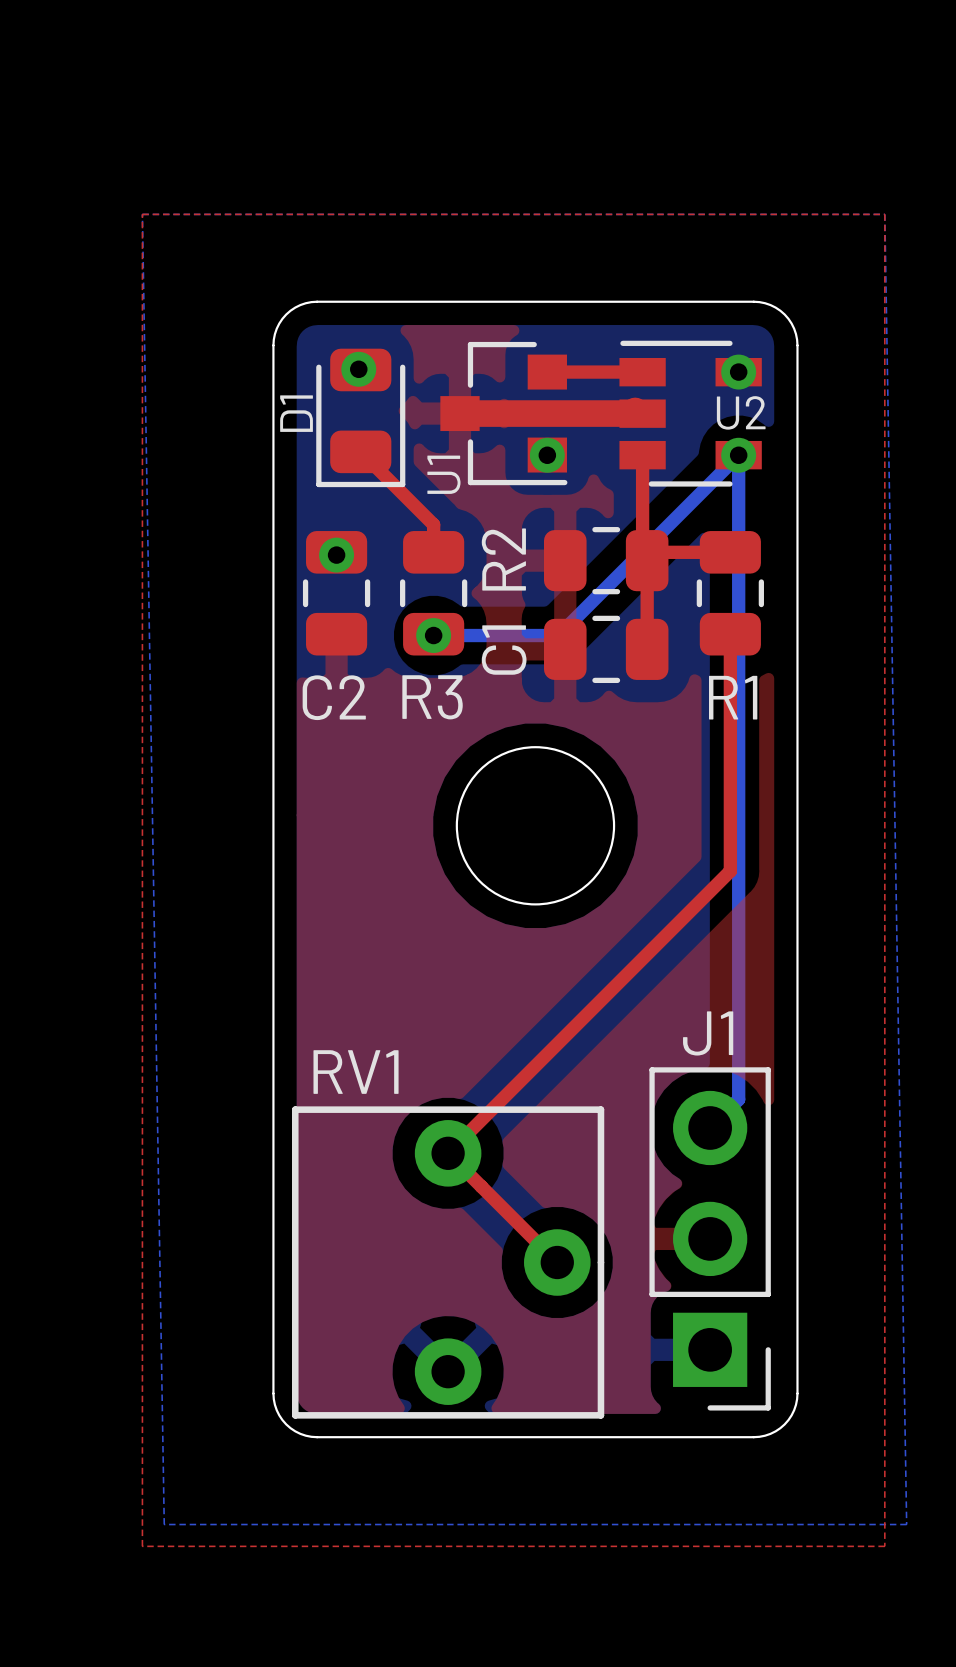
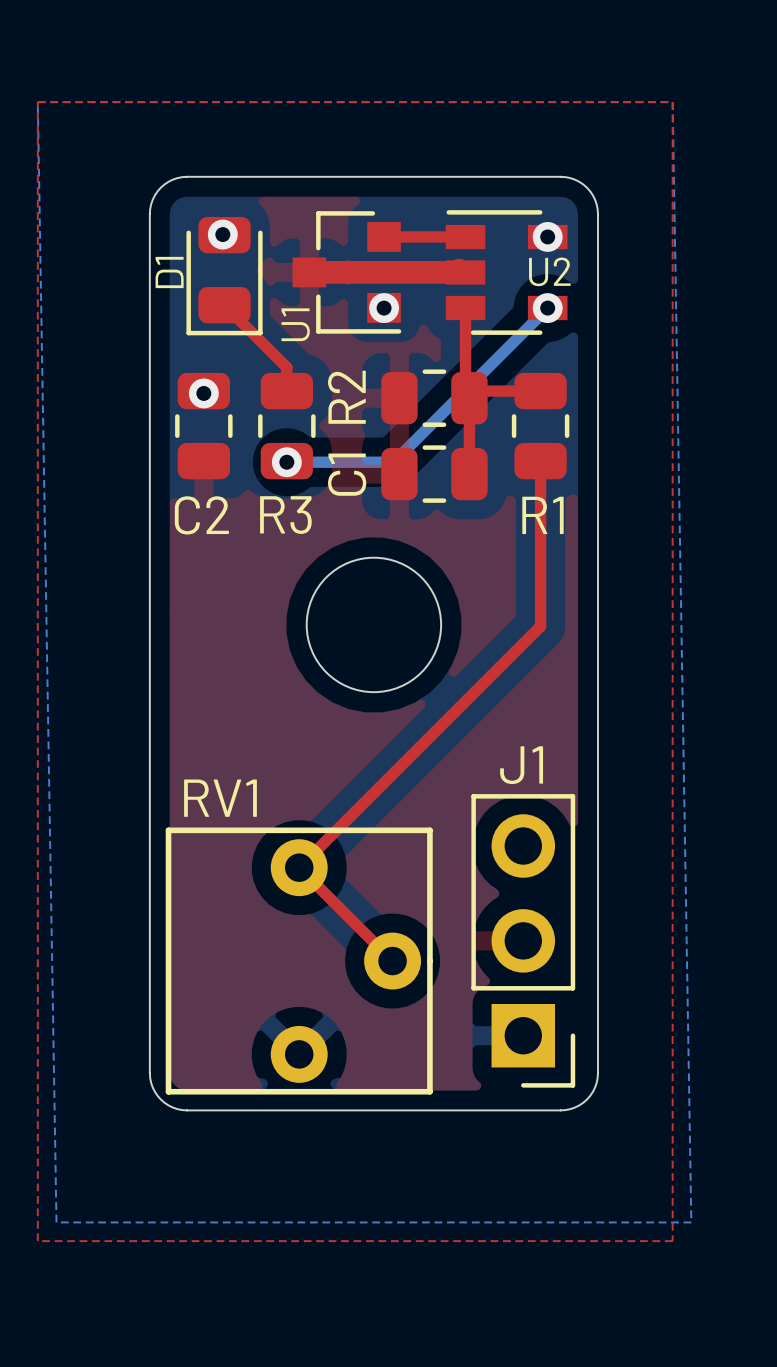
bottom track: (738, 455) (738, 1099) (710, 1127) -> none
top track: (730, 827) (730, 871) (448, 1153) (557, 1262) -> (540, 626) (299, 867) (392, 961)
J1 position: (710, 1238) -> (523, 940)
RV1 position: (448, 1262) -> (299, 961)
board edge: (273, 1349) (273, 1399) (279, 1415) (295, 1431) (317, 1437) (759, 1436) (780, 1428) (794, 1410) (797, 1393) (797, 1349) -> (149, 1073) (152, 1087) (160, 1099) (172, 1107) (187, 1110) (565, 1110) (579, 1105) (590, 1095) (596, 1082) (597, 1073)

